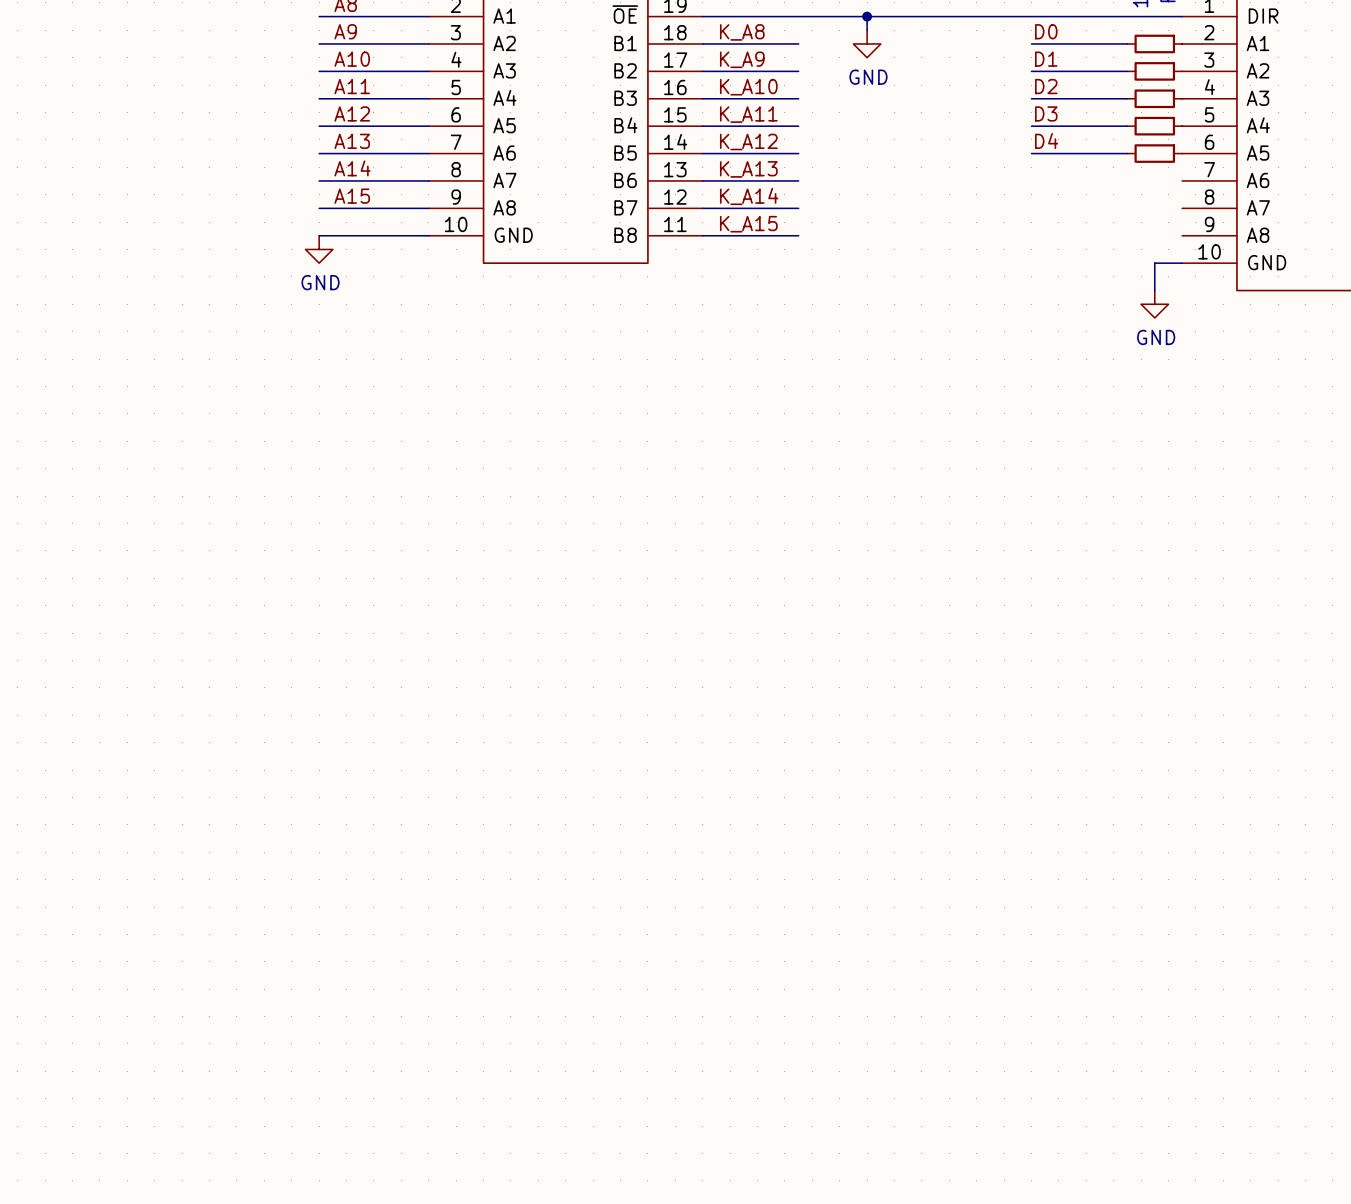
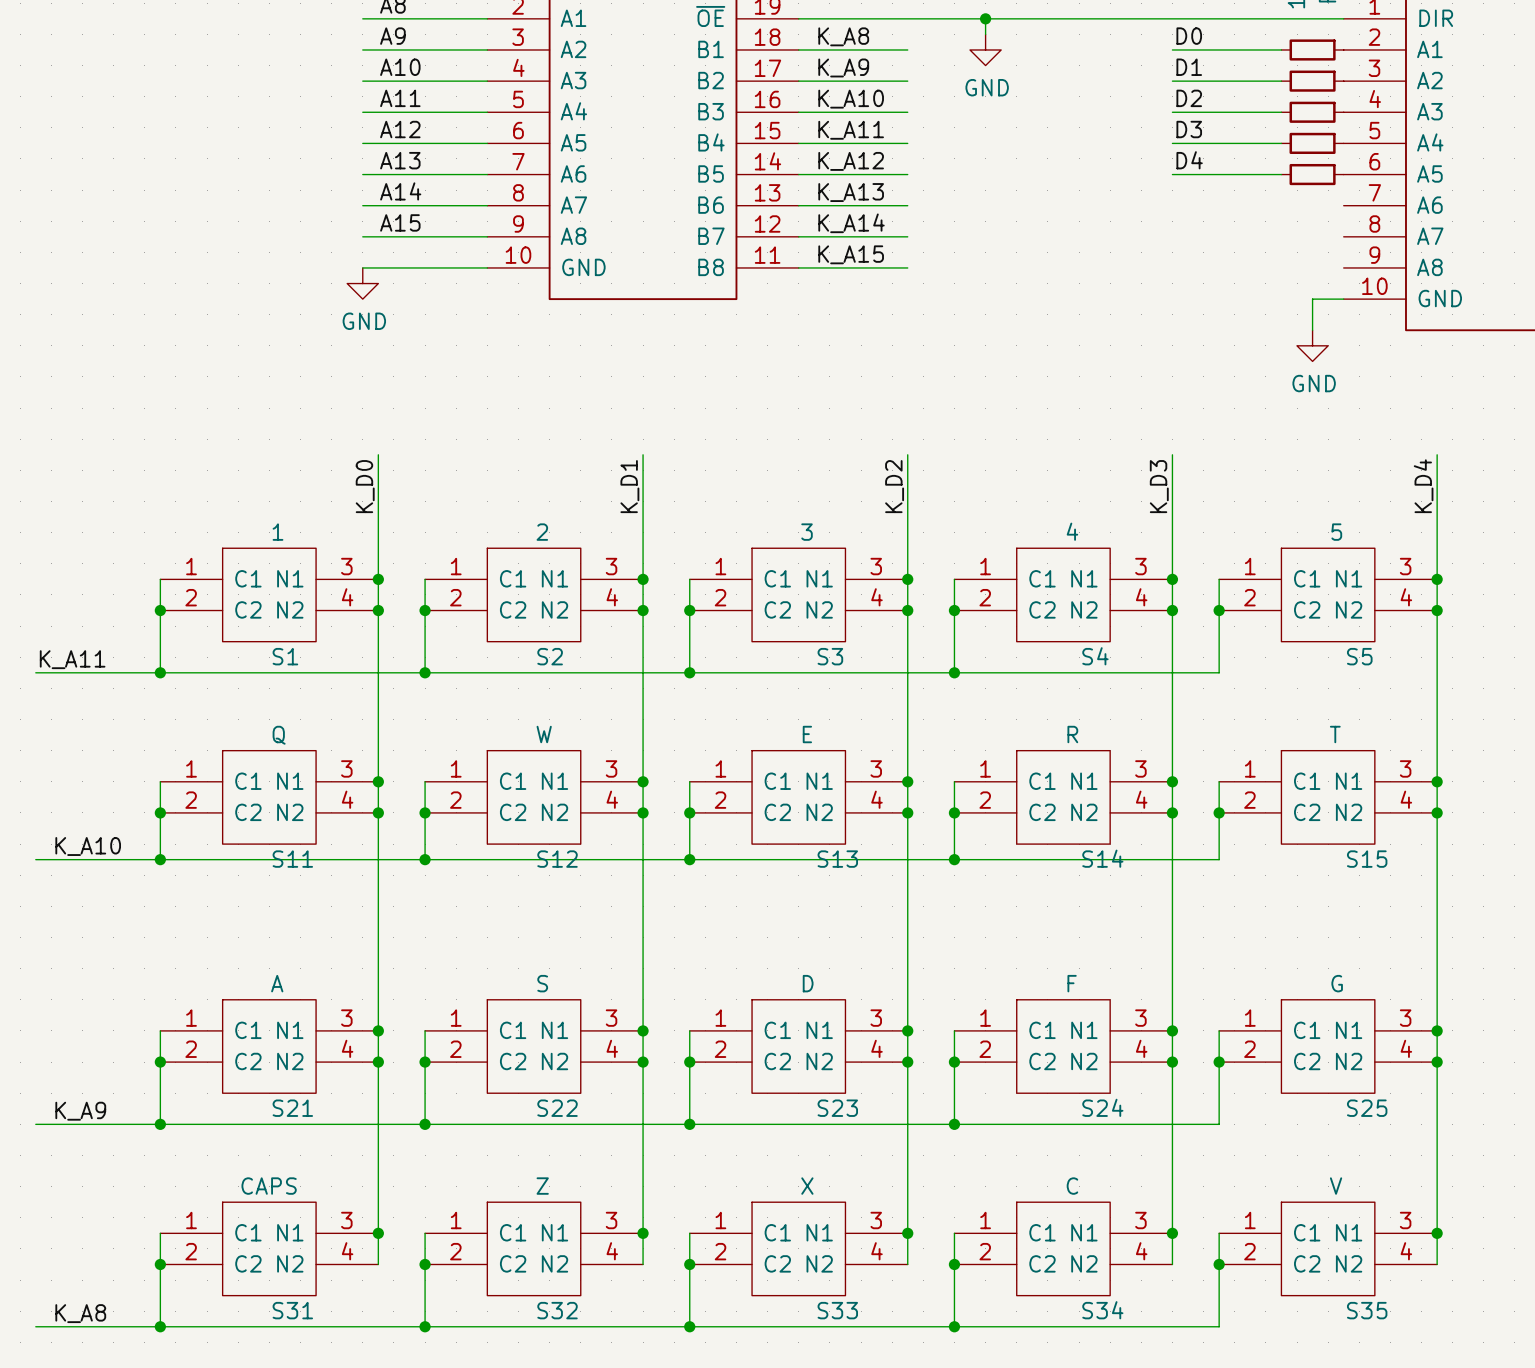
wire: none -> (378, 454) (378, 1264)
wire: none -> (643, 454) (643, 1264)
wire: none -> (907, 454) (907, 1264)
wire: none -> (1172, 454) (1172, 1264)
wire: none -> (1437, 454) (1437, 1264)
label: none -> K_D4 (1423, 486)
label: none -> K_D0 (365, 486)
label: none -> K_D1 (629, 486)
label: none -> K_D2 (894, 486)
label: none -> K_D3 (1159, 486)
wire: none -> (160, 579) (160, 672)
junction: none -> (378, 579)
wire: none -> (425, 579) (425, 672)
junction: none -> (643, 579)
wire: none -> (689, 579) (689, 672)
junction: none -> (907, 579)
wire: none -> (954, 579) (954, 672)
junction: none -> (1172, 579)
wire: none -> (1219, 579) (1219, 672) (35, 672)
junction: none -> (1437, 579)
S1: none -> 1 (269, 594)
S2: none -> 2 (534, 594)
S3: none -> 3 (798, 594)
S4: none -> 4 (1063, 594)
S5: none -> 5 (1328, 594)
junction: none -> (160, 610)
junction: none -> (378, 610)
junction: none -> (425, 610)
junction: none -> (643, 610)
junction: none -> (689, 610)
junction: none -> (907, 610)
junction: none -> (954, 610)
junction: none -> (1172, 610)
junction: none -> (1219, 610)
junction: none -> (1437, 610)
label: none -> K_A11 (72, 659)
junction: none -> (160, 672)
junction: none -> (425, 672)
junction: none -> (689, 672)
junction: none -> (954, 672)
wire: none -> (160, 781) (160, 859)
junction: none -> (378, 781)
wire: none -> (425, 781) (425, 859)
junction: none -> (643, 781)
wire: none -> (689, 781) (689, 859)
junction: none -> (907, 781)
wire: none -> (954, 781) (954, 859)
junction: none -> (1172, 781)
wire: none -> (1219, 781) (1219, 859) (35, 859)
junction: none -> (1437, 781)
S11: none -> Q (269, 797)
S12: none -> W (534, 797)
S13: none -> E (798, 797)
S14: none -> R (1063, 797)
S15: none -> T (1328, 797)
junction: none -> (160, 812)
junction: none -> (378, 812)
junction: none -> (425, 812)
junction: none -> (643, 812)
junction: none -> (689, 812)
junction: none -> (907, 812)
junction: none -> (954, 812)
junction: none -> (1172, 812)
junction: none -> (1219, 812)
junction: none -> (1437, 812)
label: none -> K_A10 (88, 846)
junction: none -> (160, 859)
junction: none -> (425, 859)
junction: none -> (689, 859)
junction: none -> (954, 859)
wire: none -> (160, 1030) (160, 1124)
junction: none -> (378, 1030)
wire: none -> (425, 1030) (425, 1124)
junction: none -> (643, 1030)
wire: none -> (689, 1030) (689, 1124)
junction: none -> (907, 1030)
wire: none -> (954, 1030) (954, 1124)
junction: none -> (1172, 1030)
wire: none -> (1219, 1030) (1219, 1124) (35, 1124)
junction: none -> (1437, 1030)
S21: none -> A (269, 1046)
S22: none -> S (534, 1046)
S23: none -> D (798, 1046)
S24: none -> F (1063, 1046)
S25: none -> G (1328, 1046)
junction: none -> (160, 1062)
junction: none -> (378, 1062)
junction: none -> (425, 1062)
junction: none -> (643, 1062)
junction: none -> (689, 1062)
junction: none -> (907, 1062)
junction: none -> (954, 1062)
junction: none -> (1172, 1062)
junction: none -> (1219, 1062)
junction: none -> (1437, 1062)
label: none -> K_A9 (80, 1111)
junction: none -> (160, 1124)
junction: none -> (425, 1124)
junction: none -> (689, 1124)
junction: none -> (954, 1124)
wire: none -> (160, 1233) (160, 1326)
junction: none -> (378, 1233)
wire: none -> (425, 1233) (425, 1326)
junction: none -> (643, 1233)
wire: none -> (689, 1233) (689, 1326)
junction: none -> (907, 1233)
wire: none -> (954, 1233) (954, 1326)
junction: none -> (1172, 1233)
wire: none -> (1219, 1233) (1219, 1326) (35, 1326)
junction: none -> (1437, 1233)
S31: none -> CAPS (269, 1248)
S32: none -> Z (534, 1248)
S33: none -> X (798, 1248)
S34: none -> C (1063, 1248)
S35: none -> V (1328, 1248)
junction: none -> (160, 1264)
junction: none -> (425, 1264)
junction: none -> (689, 1264)
junction: none -> (954, 1264)
junction: none -> (1219, 1264)
label: none -> K_A8 (80, 1313)
junction: none -> (160, 1326)
junction: none -> (425, 1326)
junction: none -> (689, 1326)
junction: none -> (954, 1326)

